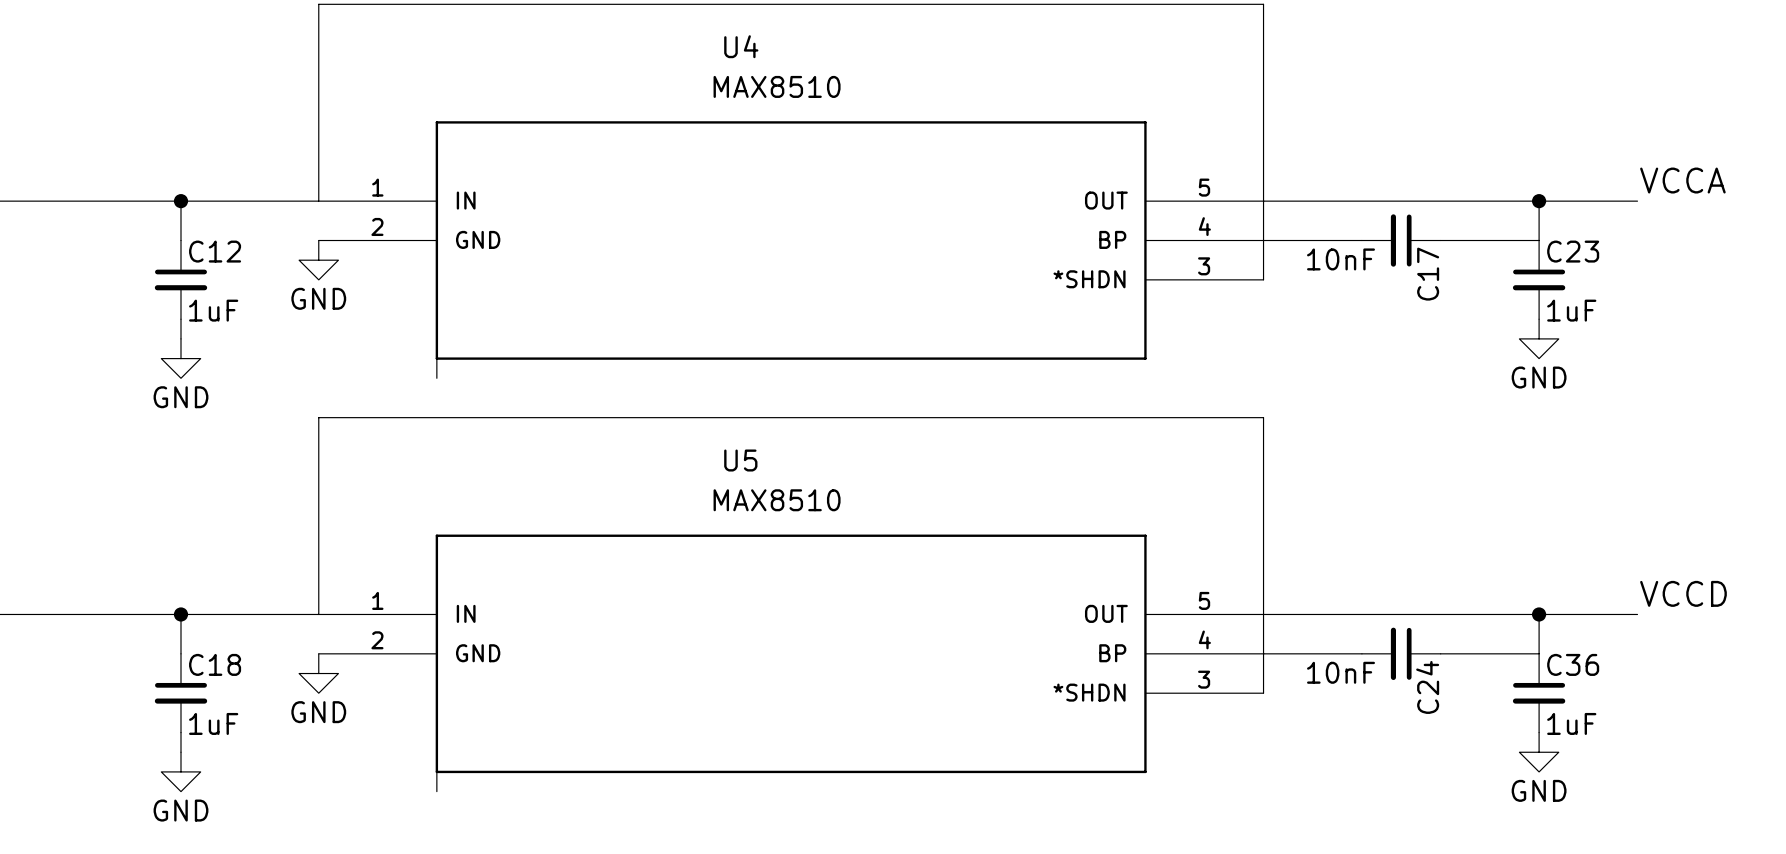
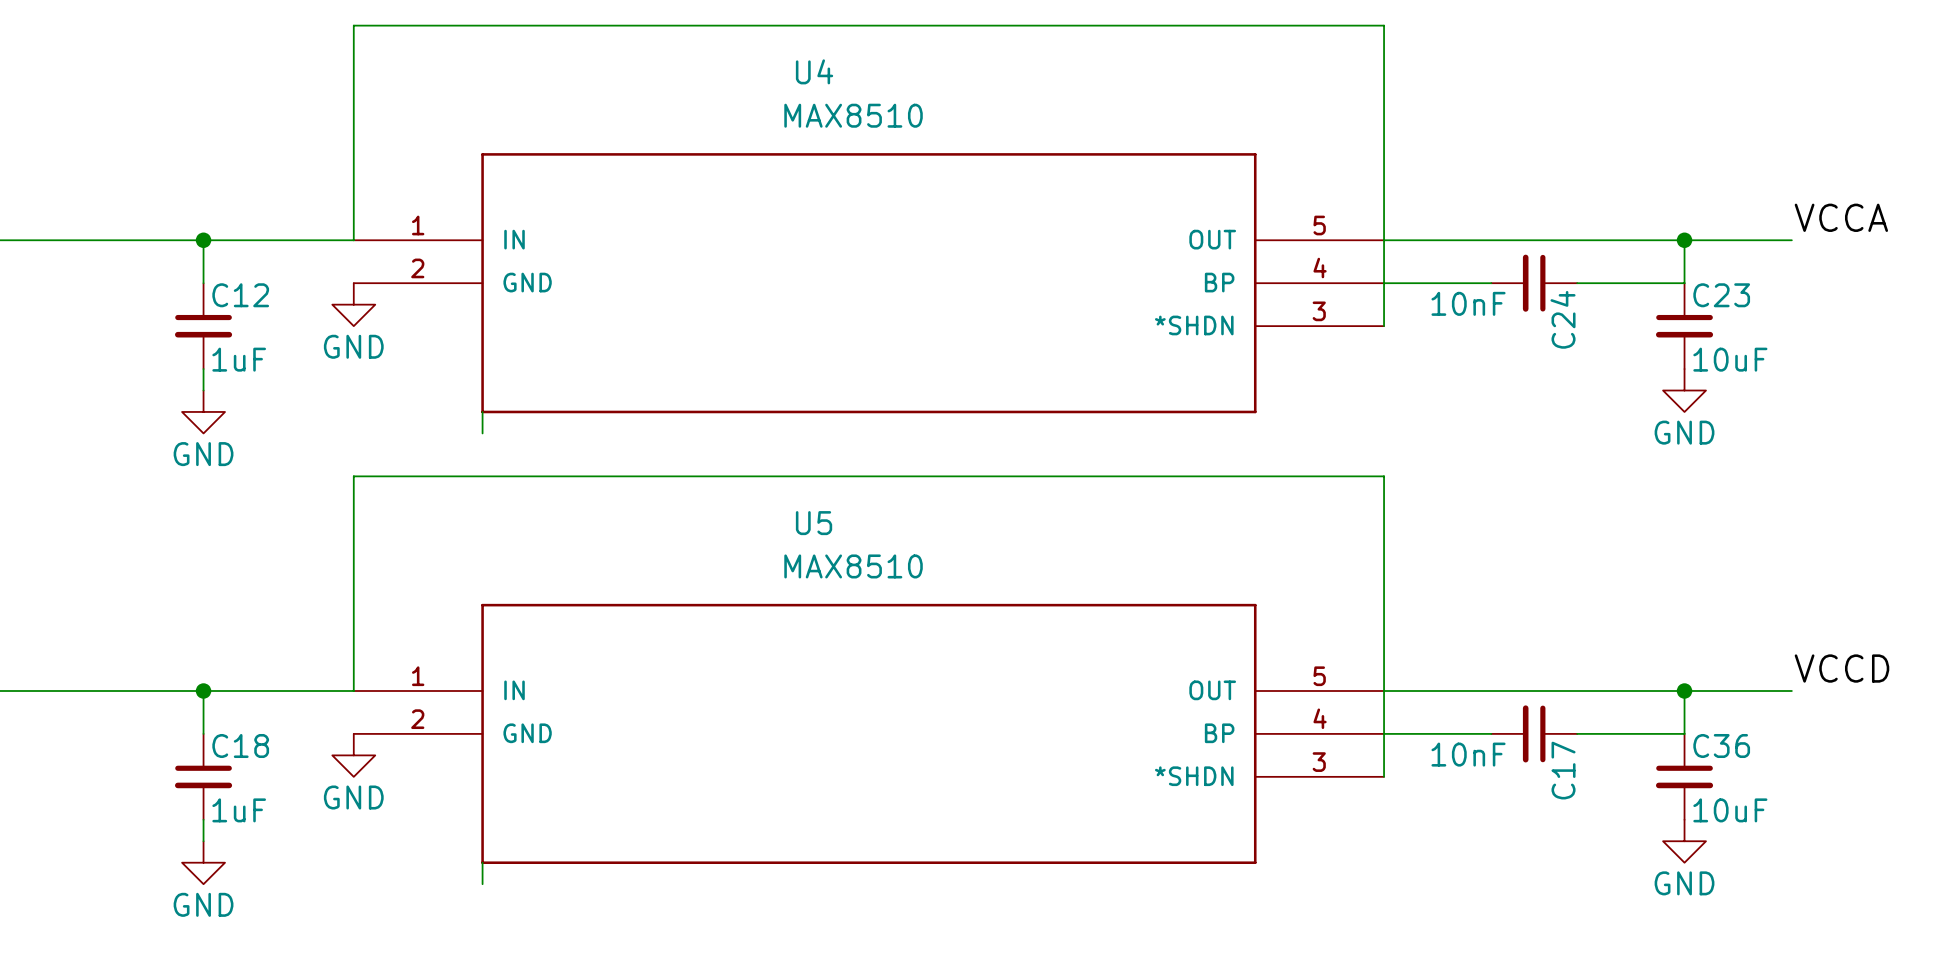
C17 name: C17 (1428, 274) -> C24 (1563, 319)
C23 value: 1uF (1571, 310) -> 10uF (1730, 359)
C24 name: C24 (1427, 687) -> C17 (1563, 770)
C36 value: 1uF (1571, 723) -> 10uF (1730, 810)

